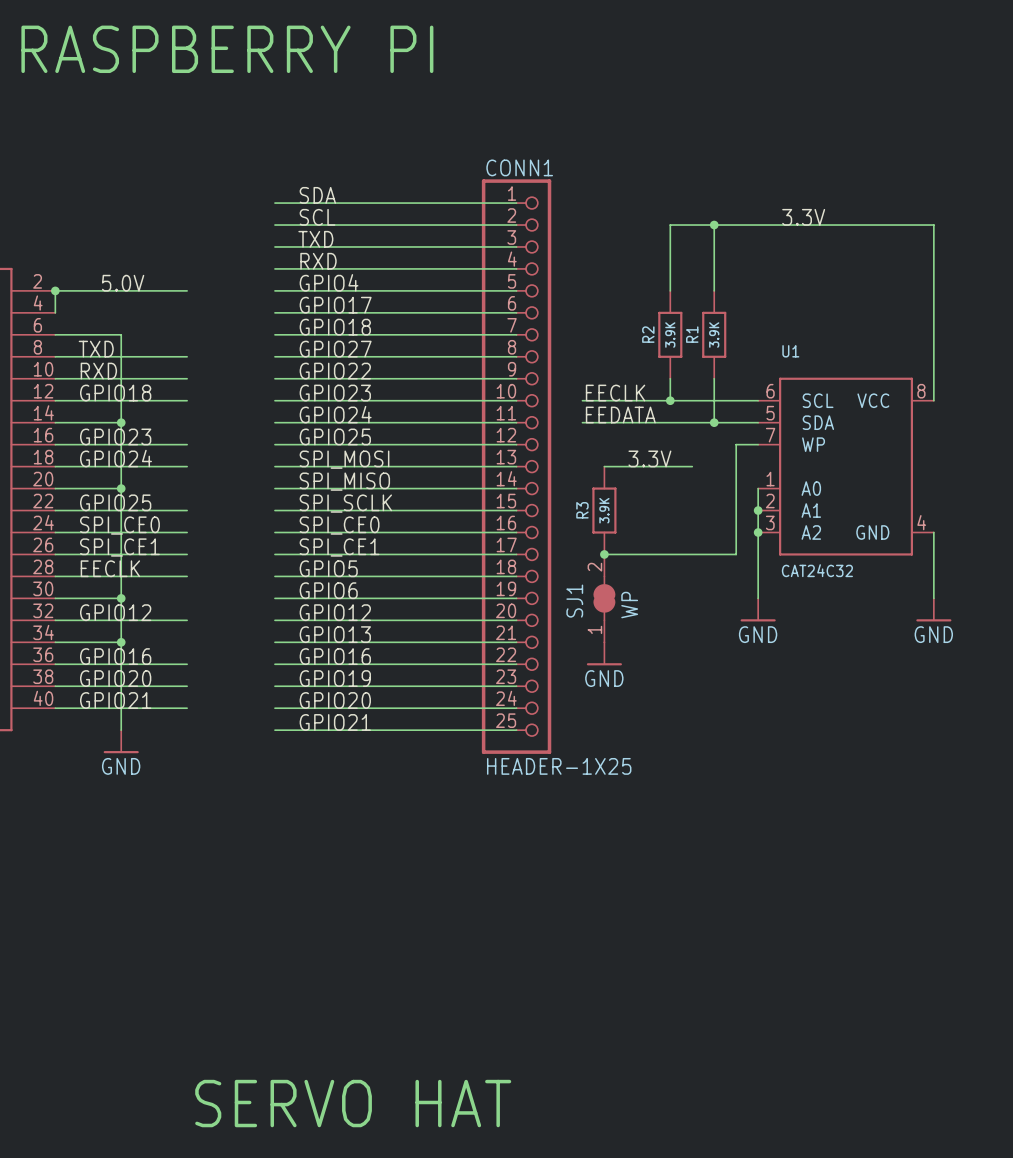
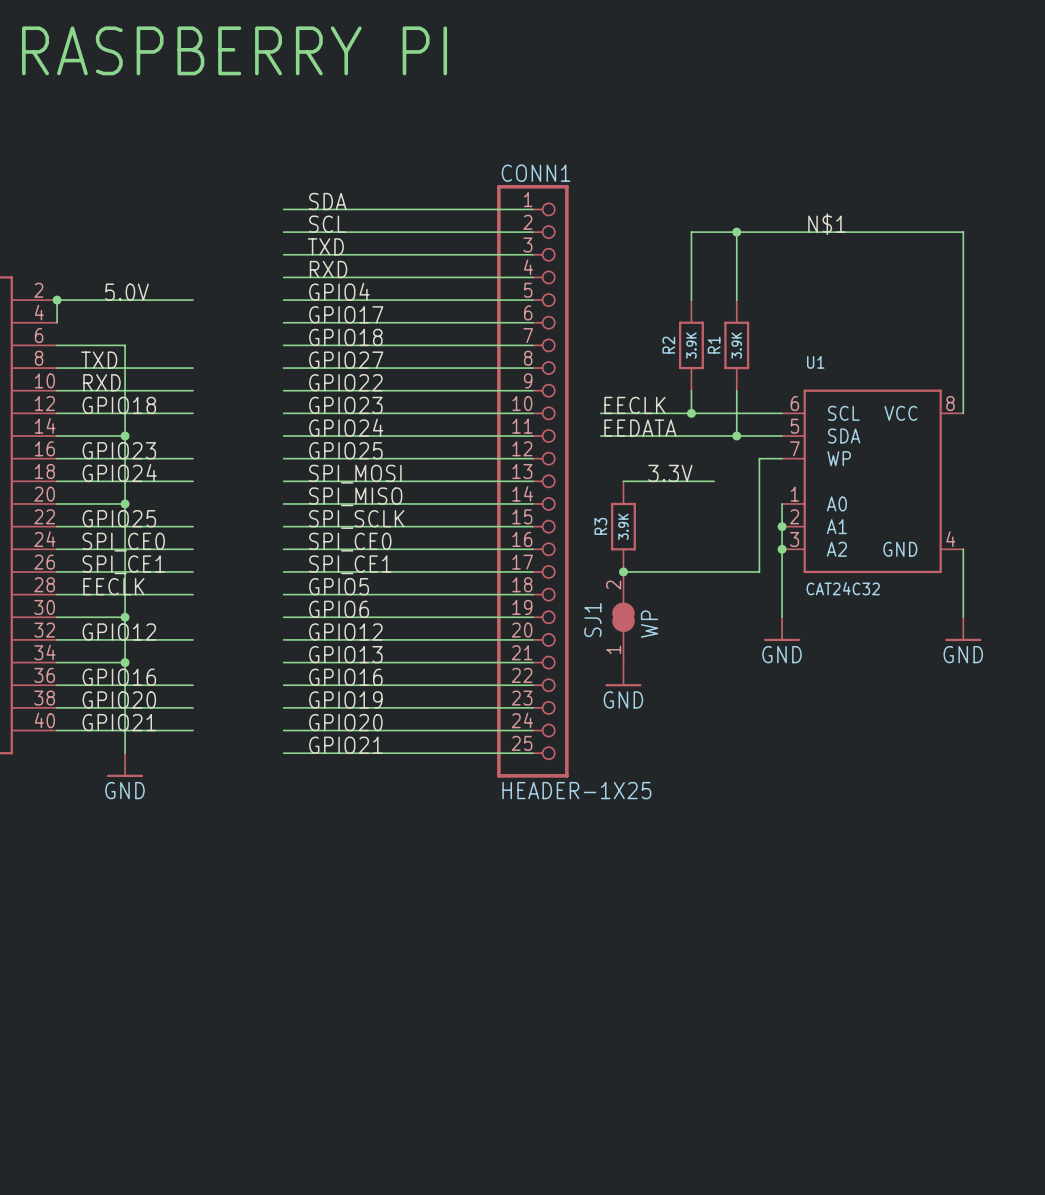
label: 3.3V (803, 217) -> N$1 (826, 224)
text: SERVO HAT (353, 1103) -> none

